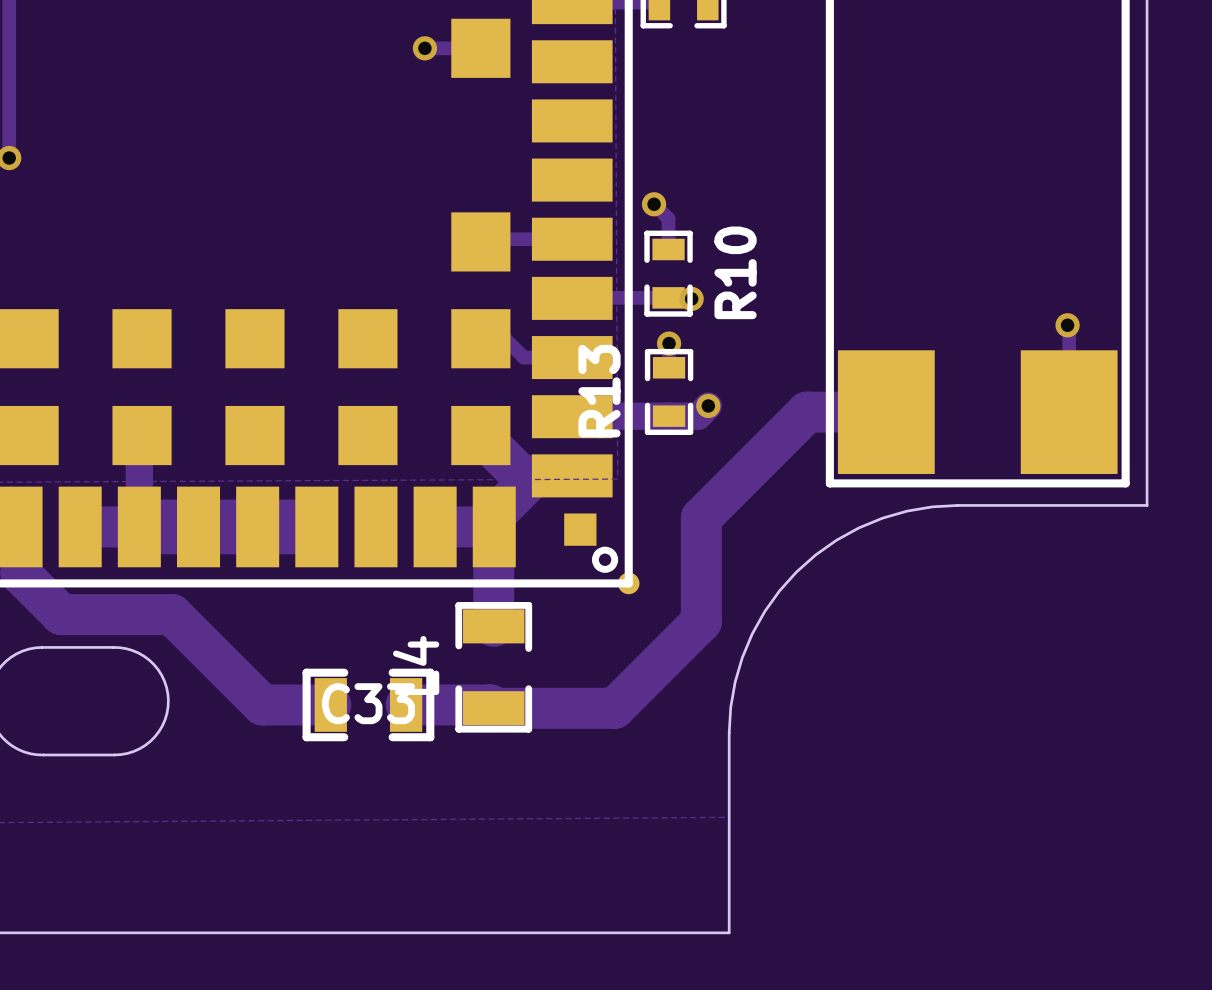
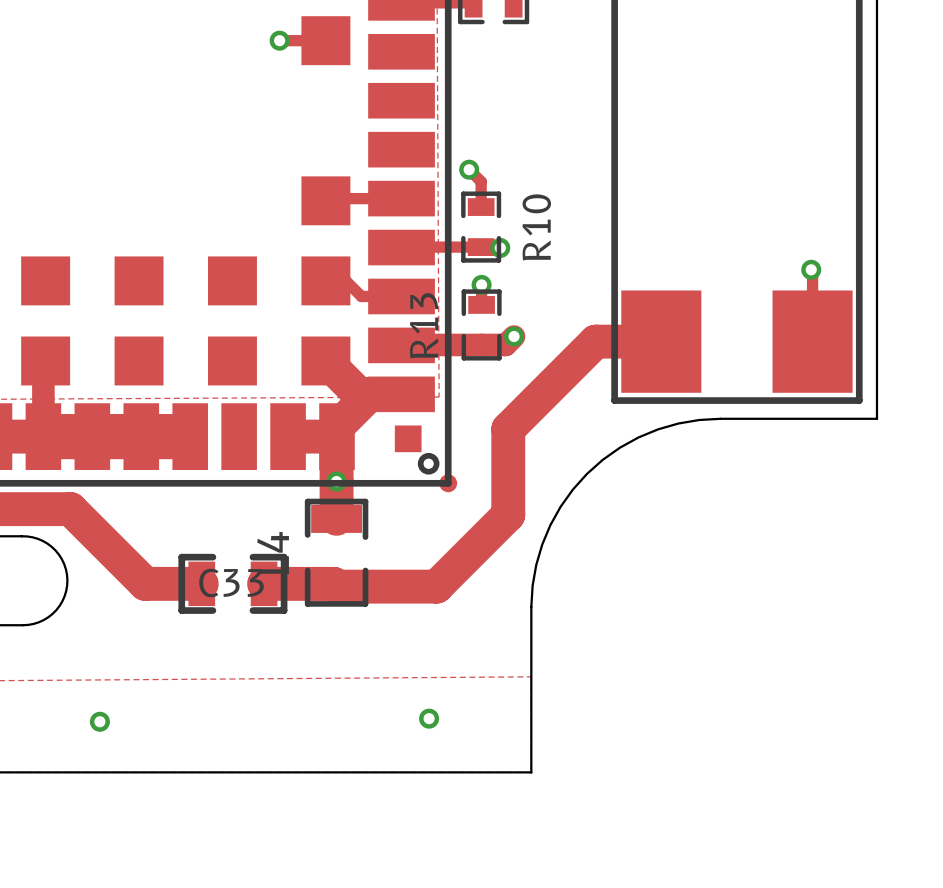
via: none -> (336, 481)
via: none -> (429, 718)
via: none -> (99, 721)

